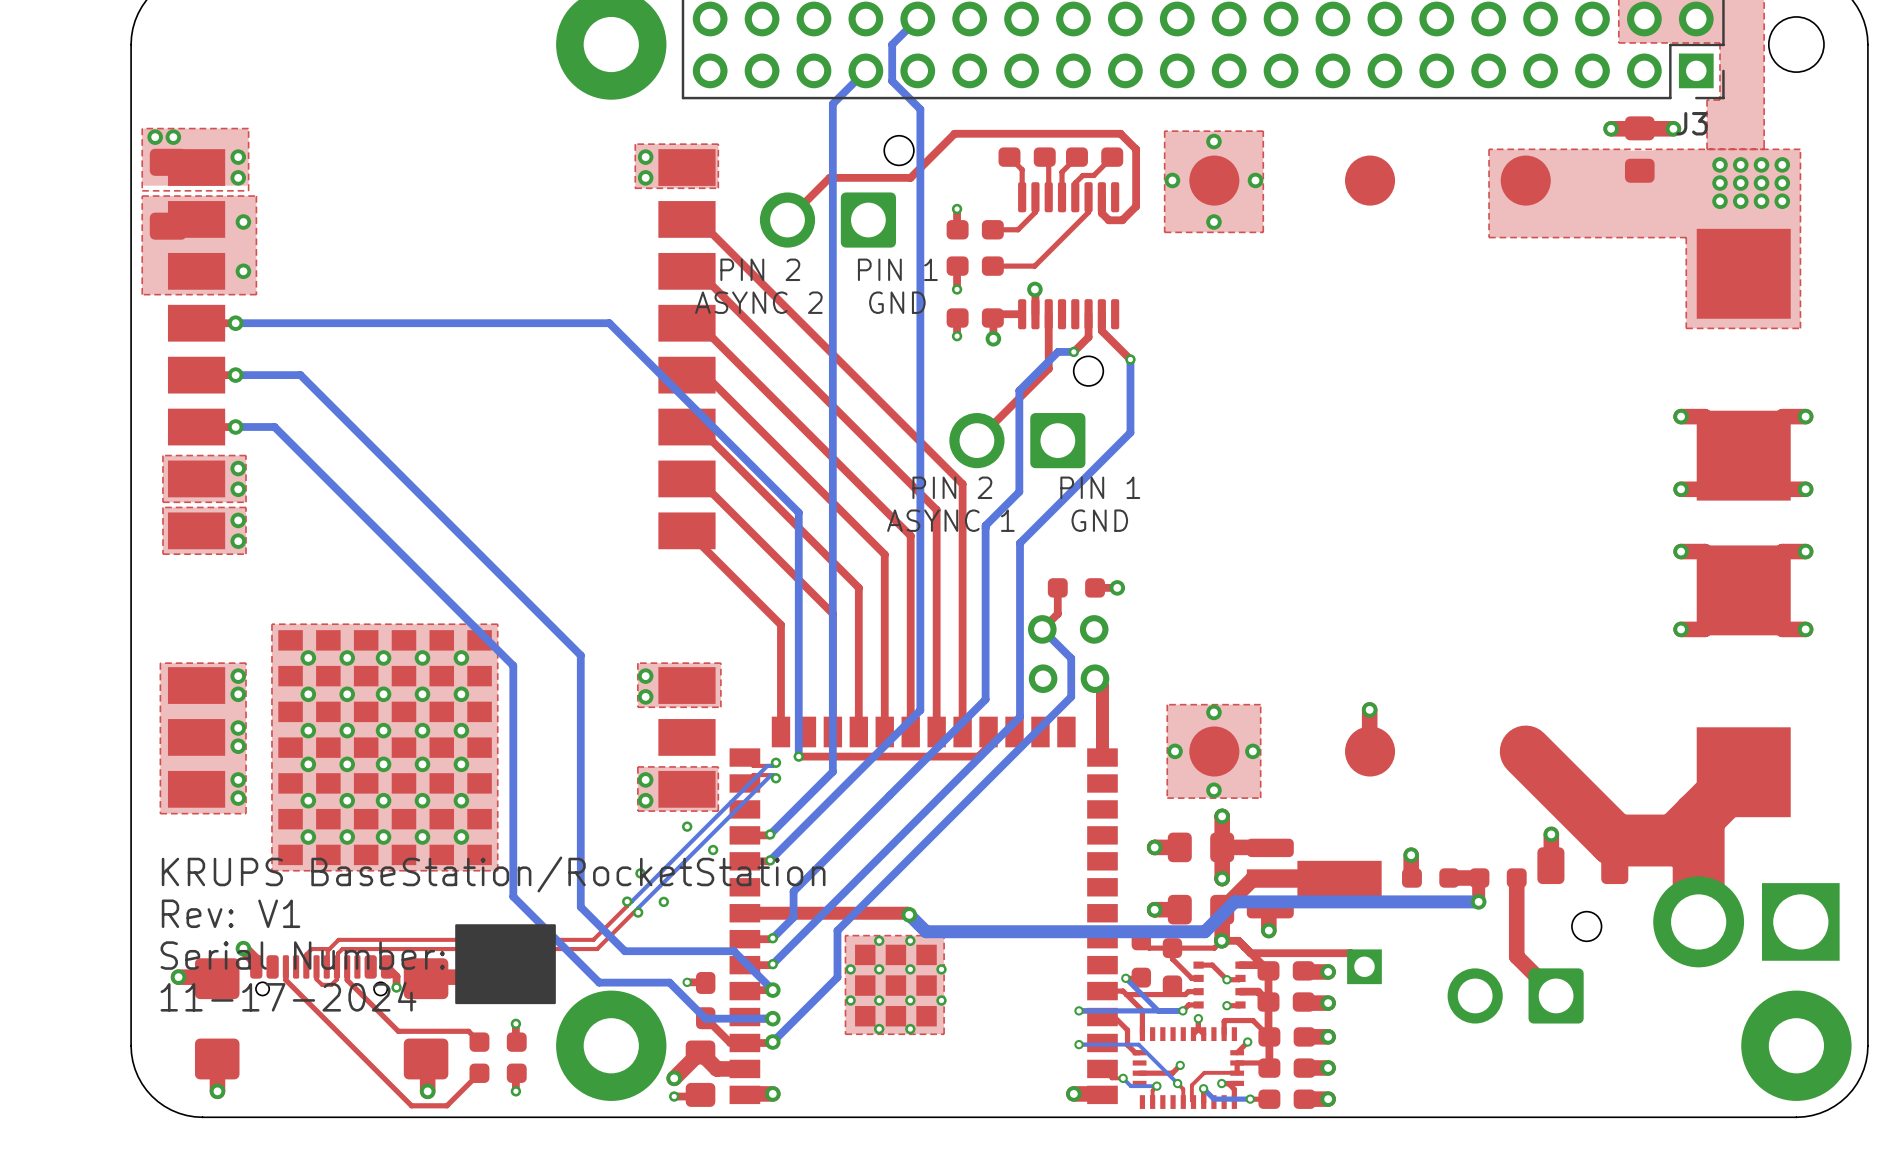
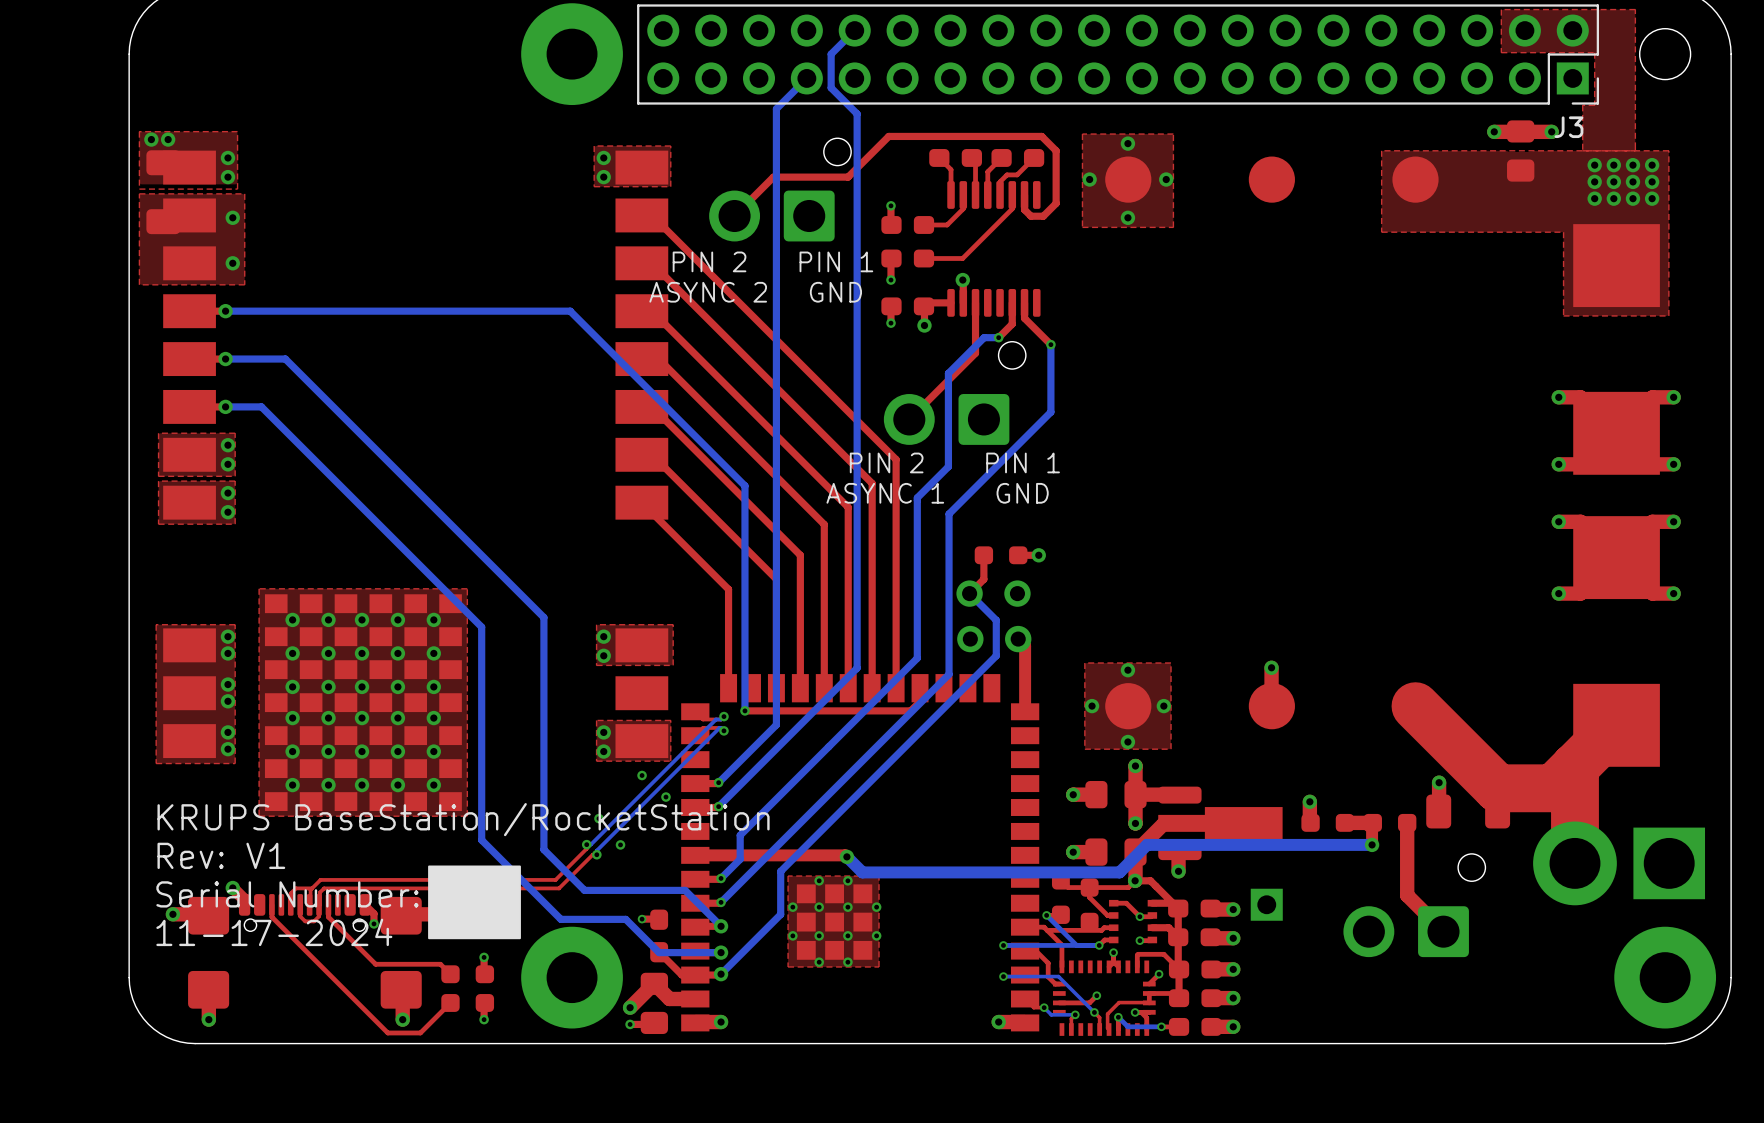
top track: (1250, 953) (1350, 953) (1364, 966) -> none

